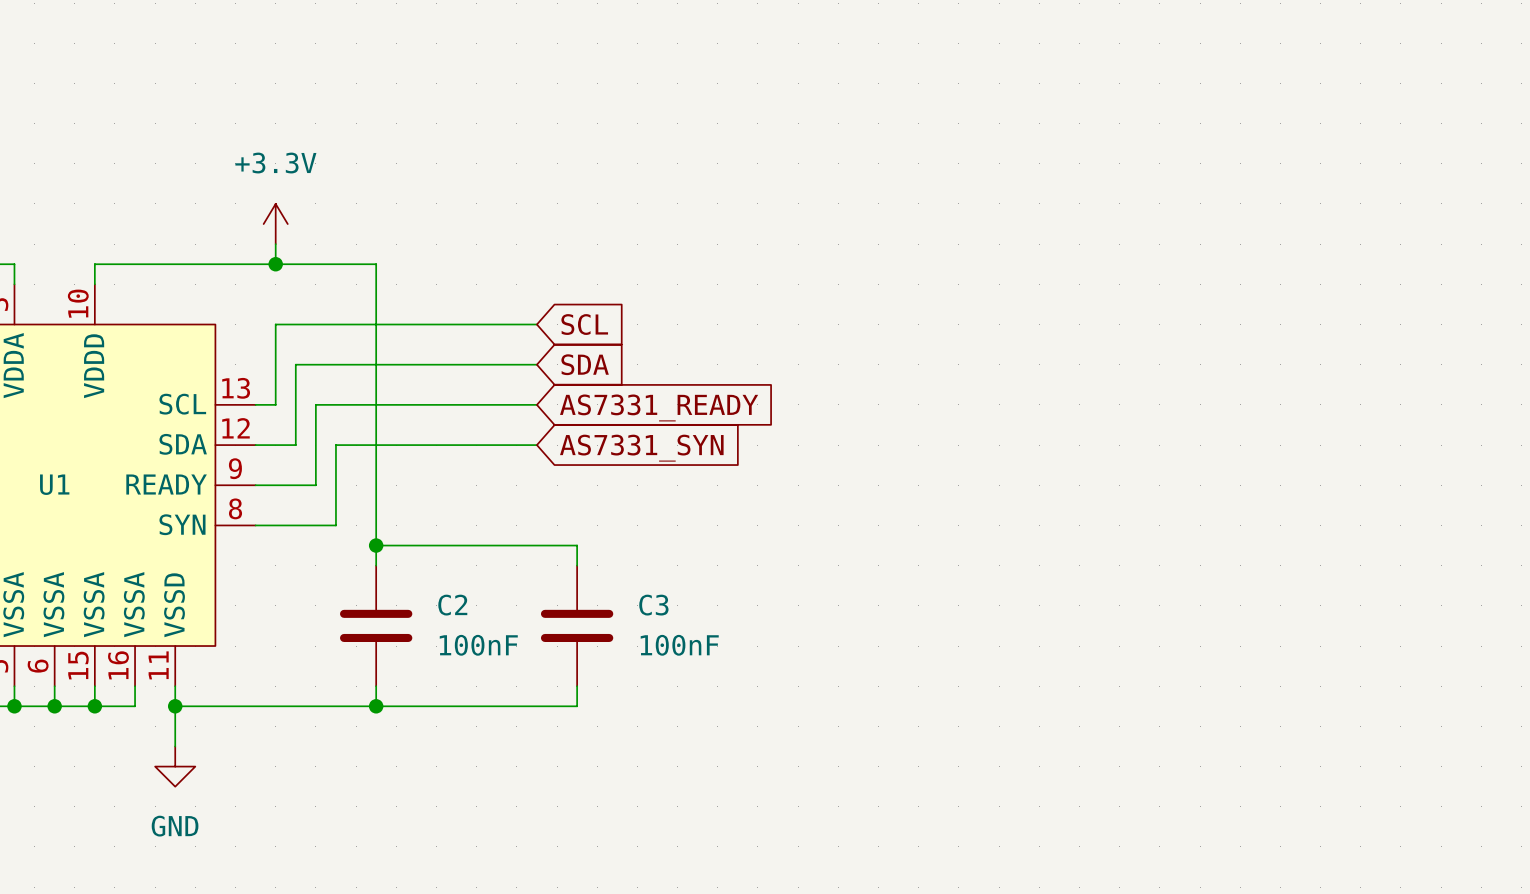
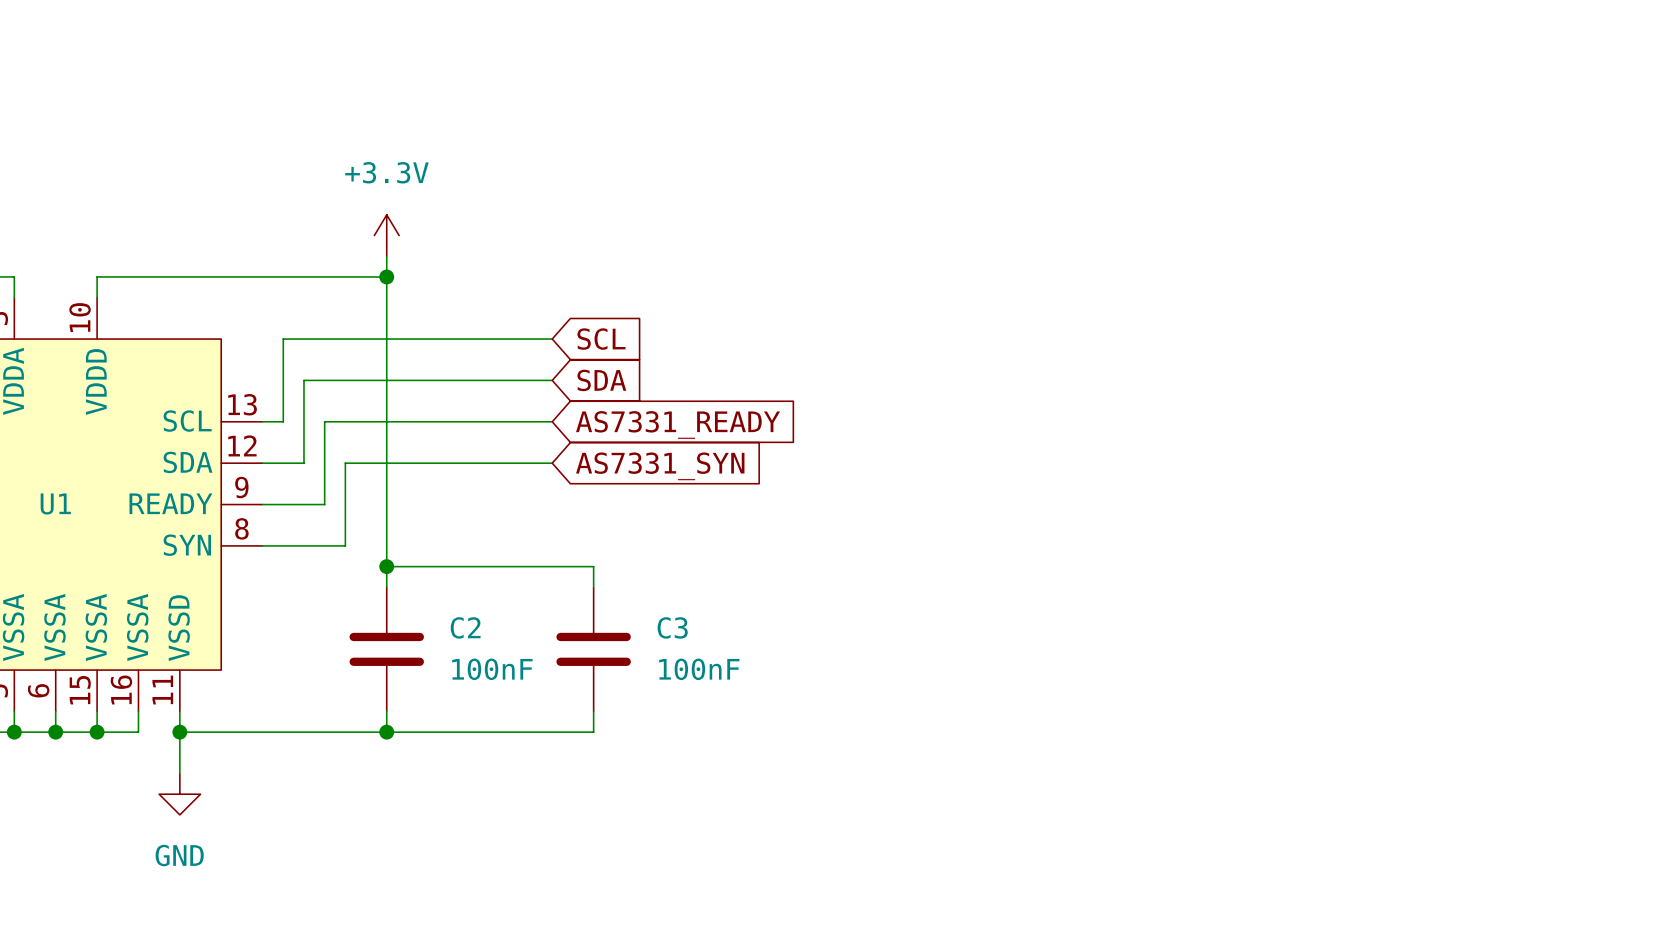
power symbol position: +3.3V (275, 224) -> +3.3V (386, 235)
wire: (275, 244) (275, 264) -> (386, 256) (386, 276)
junction: (275, 264) -> none
junction: none -> (386, 276)

